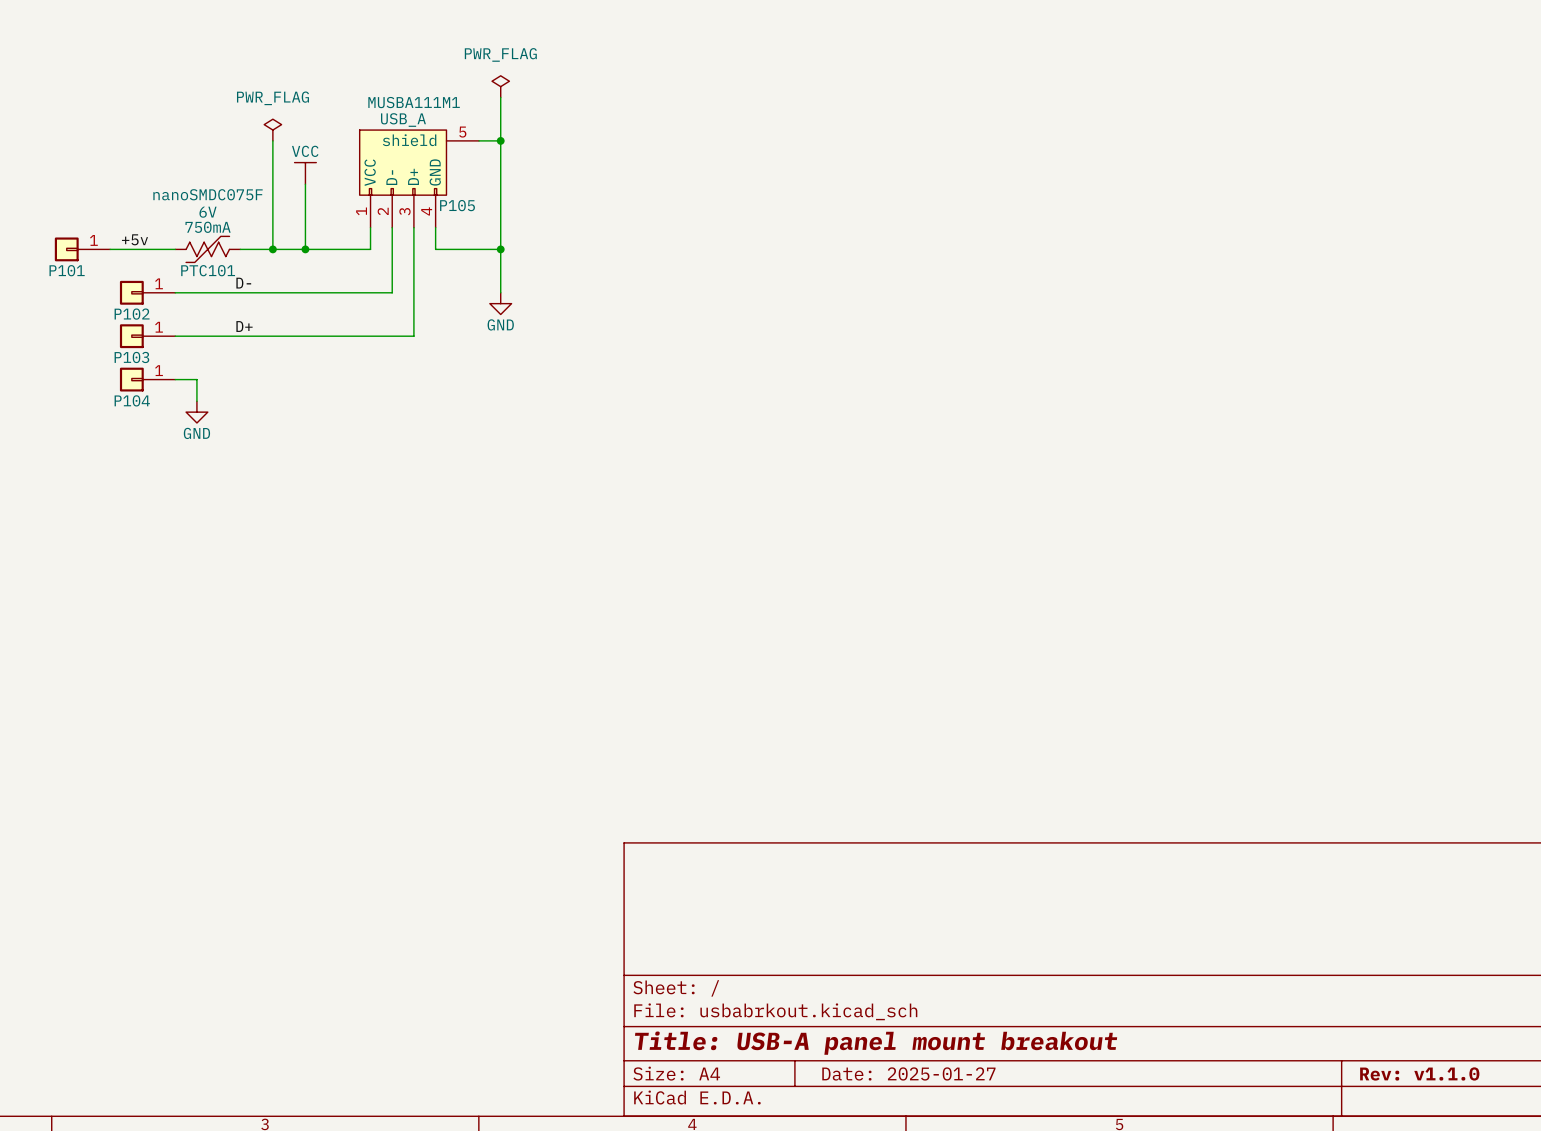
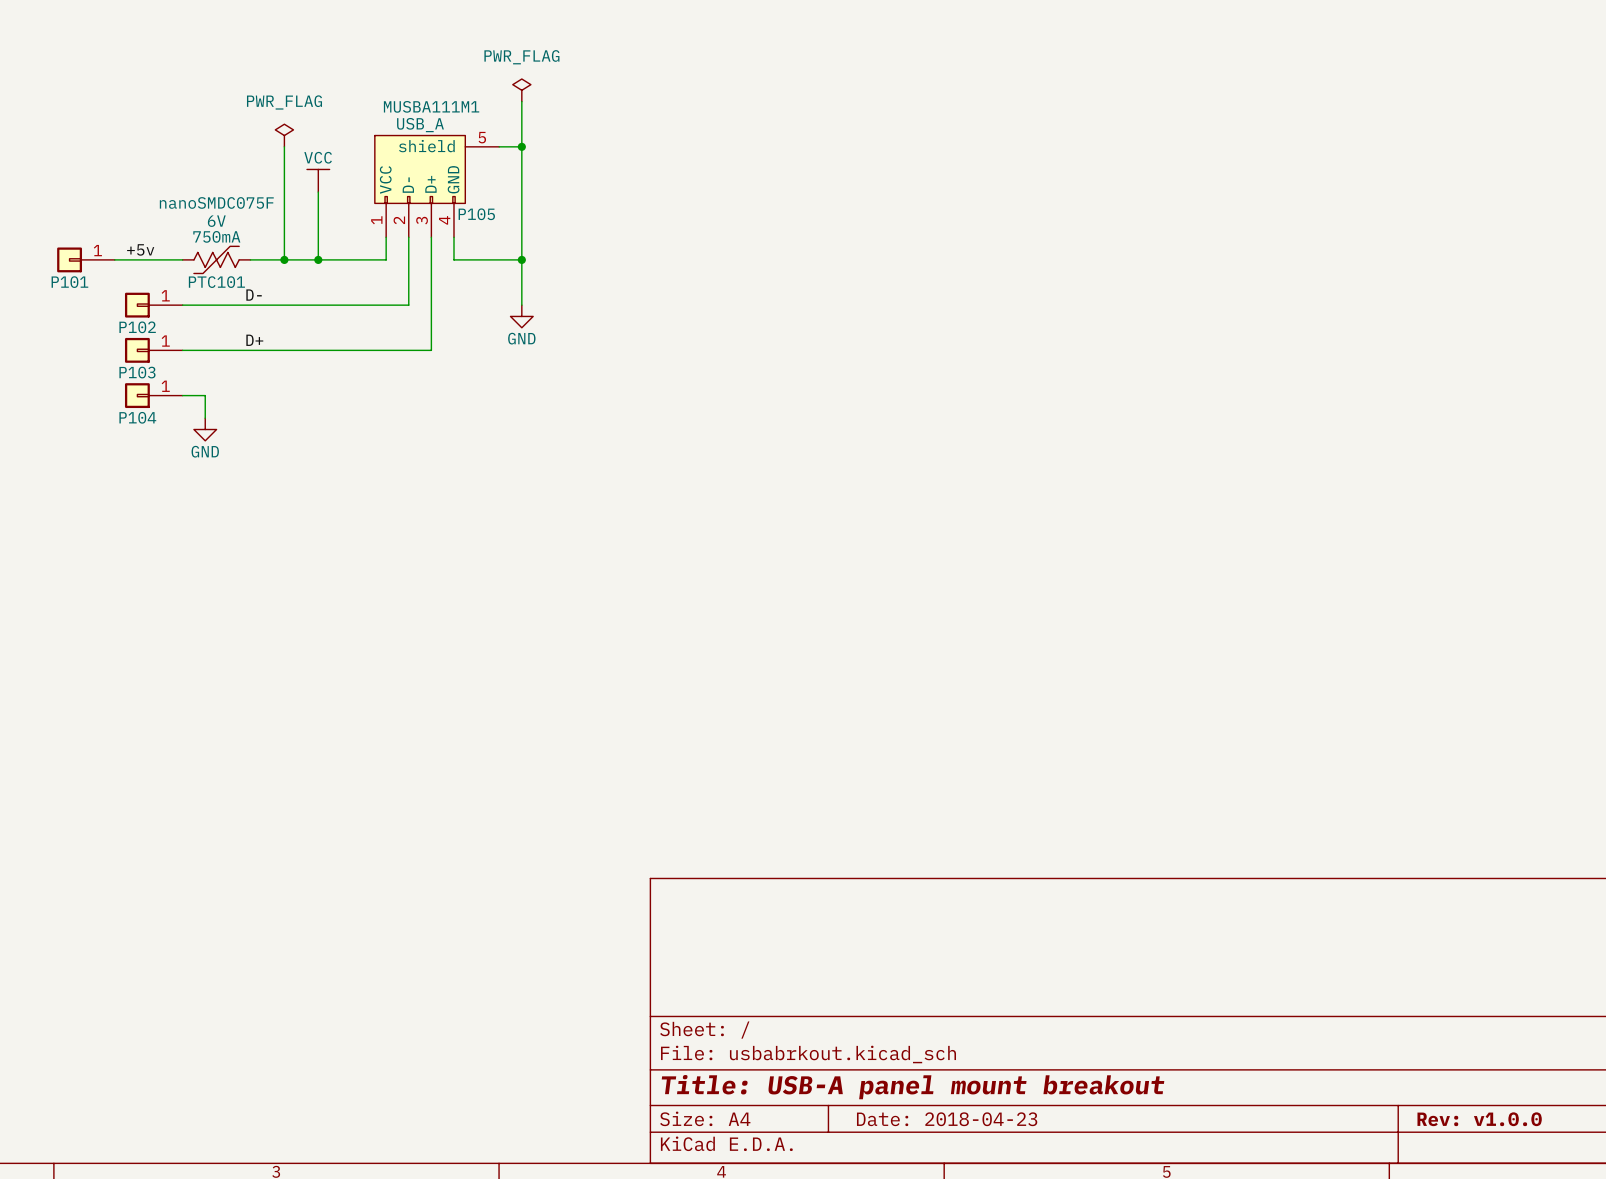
title block: Date: 2025-01-27 (908, 1073) -> Date: 2018-04-23 (947, 1119)
title block: Rev: v1.1.0 (1419, 1073) -> Rev: v1.0.0 (1479, 1119)

